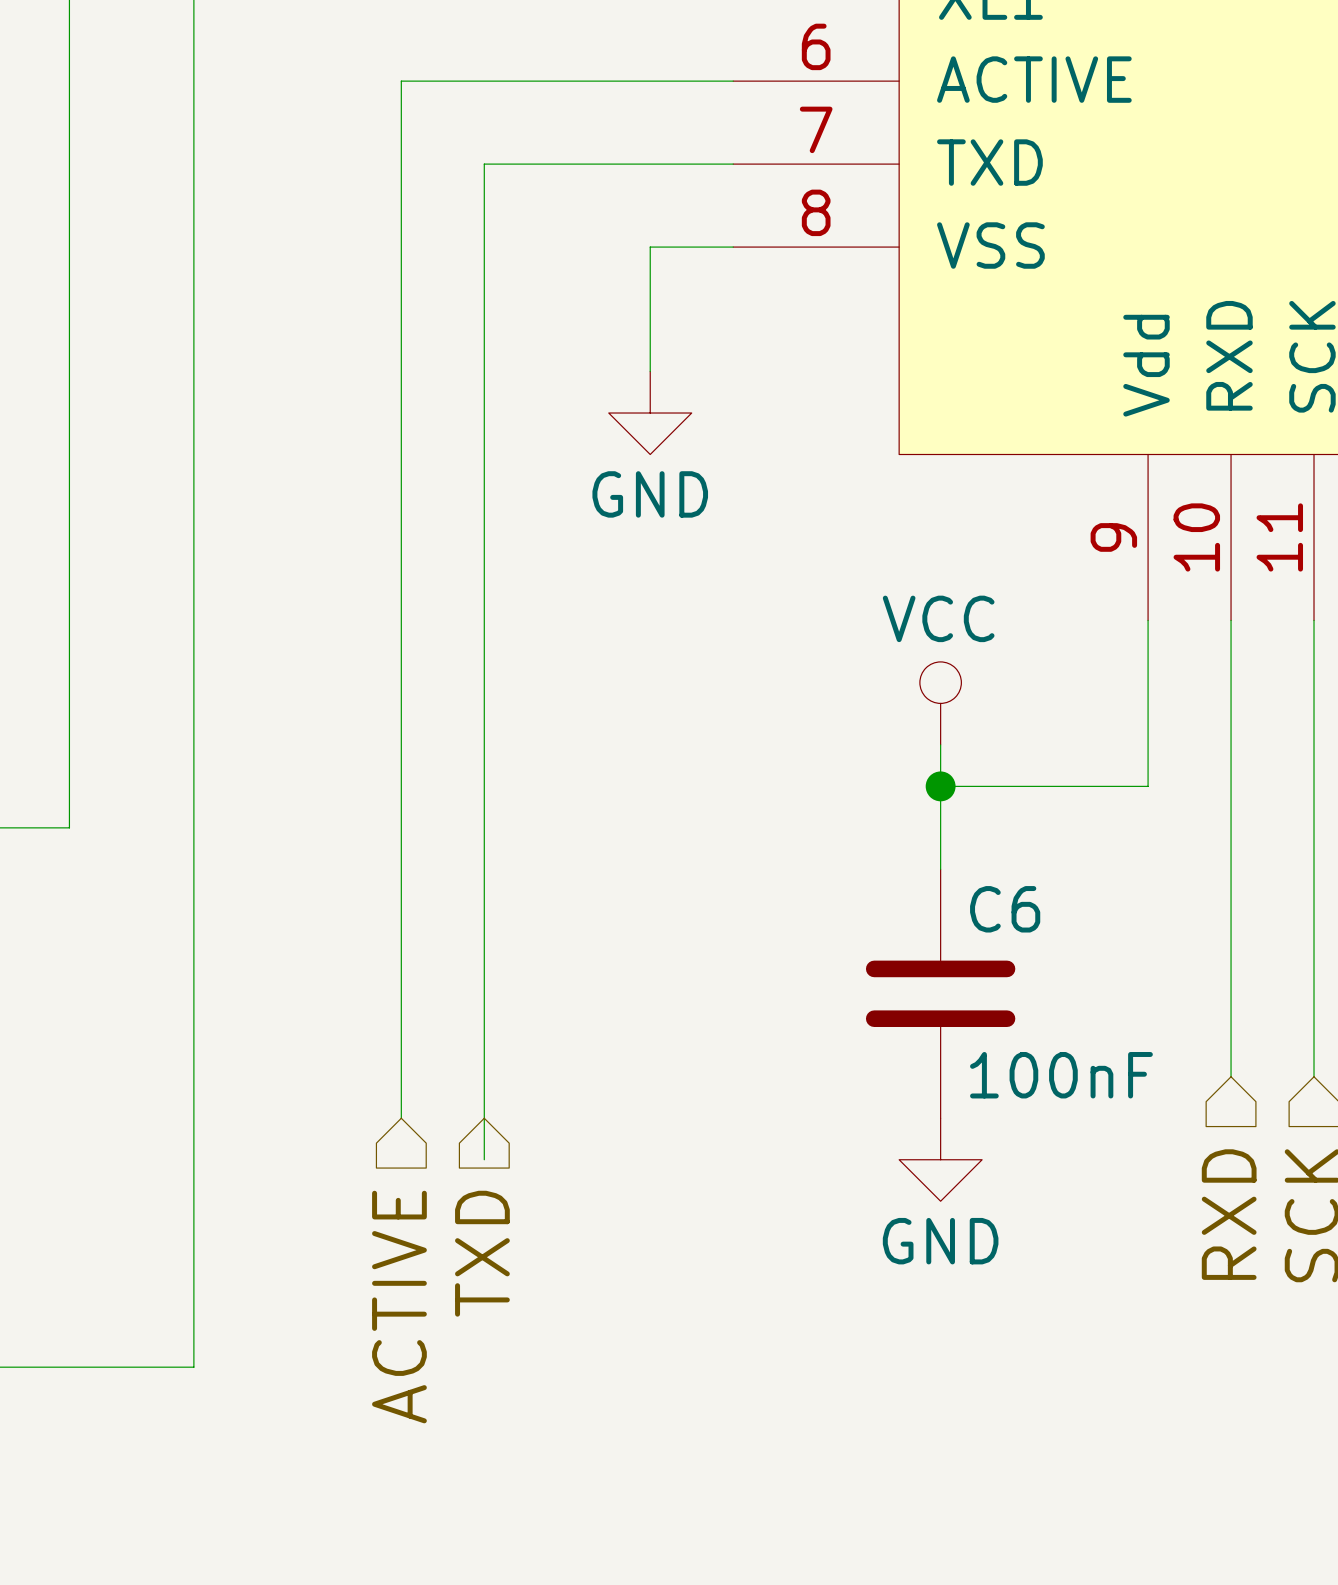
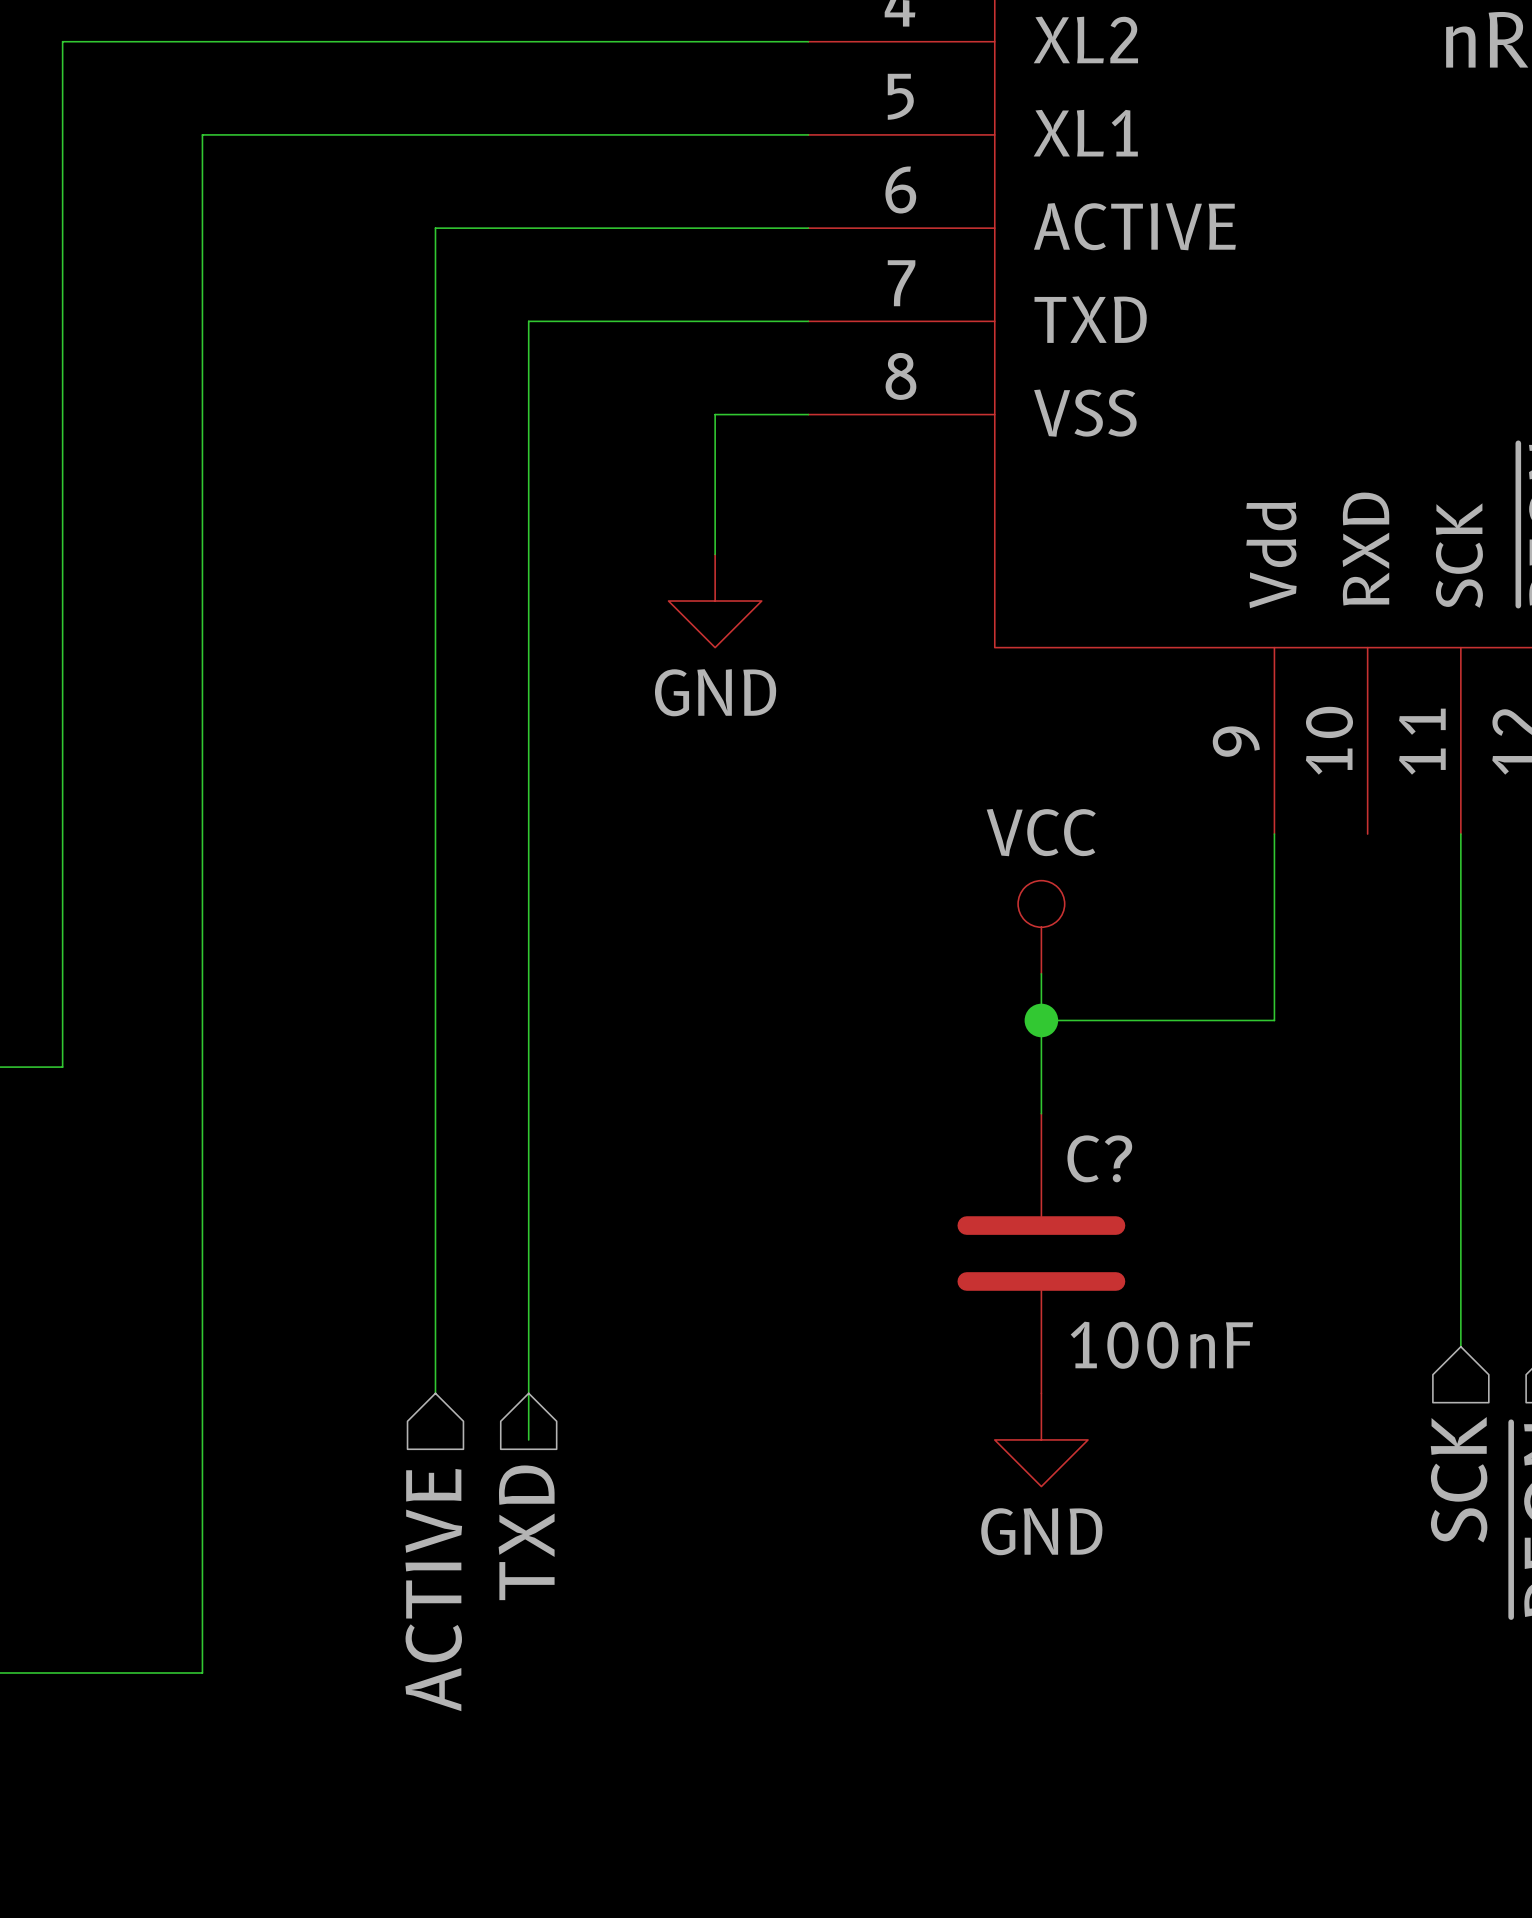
wire: (1231, 620) (1231, 1076) -> none
C6 name: C6 (1005, 909) -> C? (1099, 1158)
hierarchical label: RXD (1229, 1214) -> none

